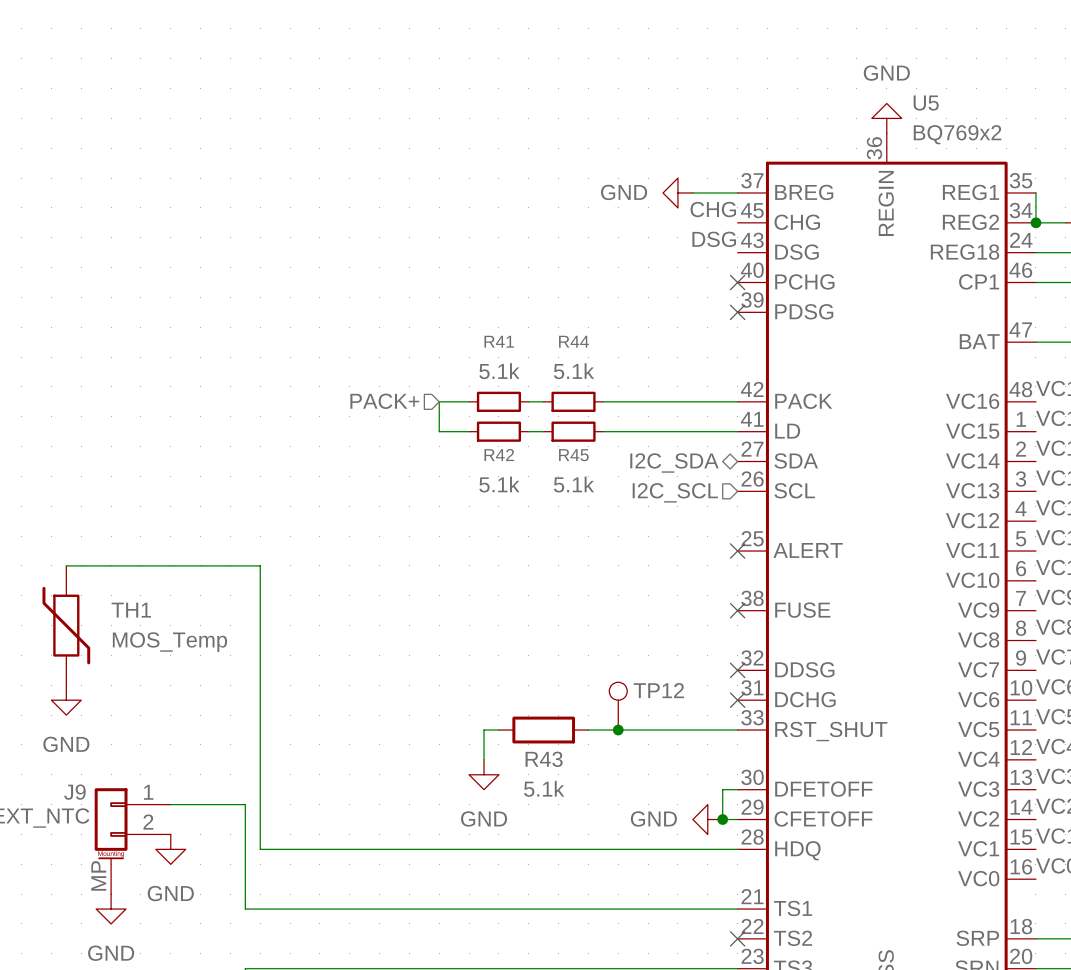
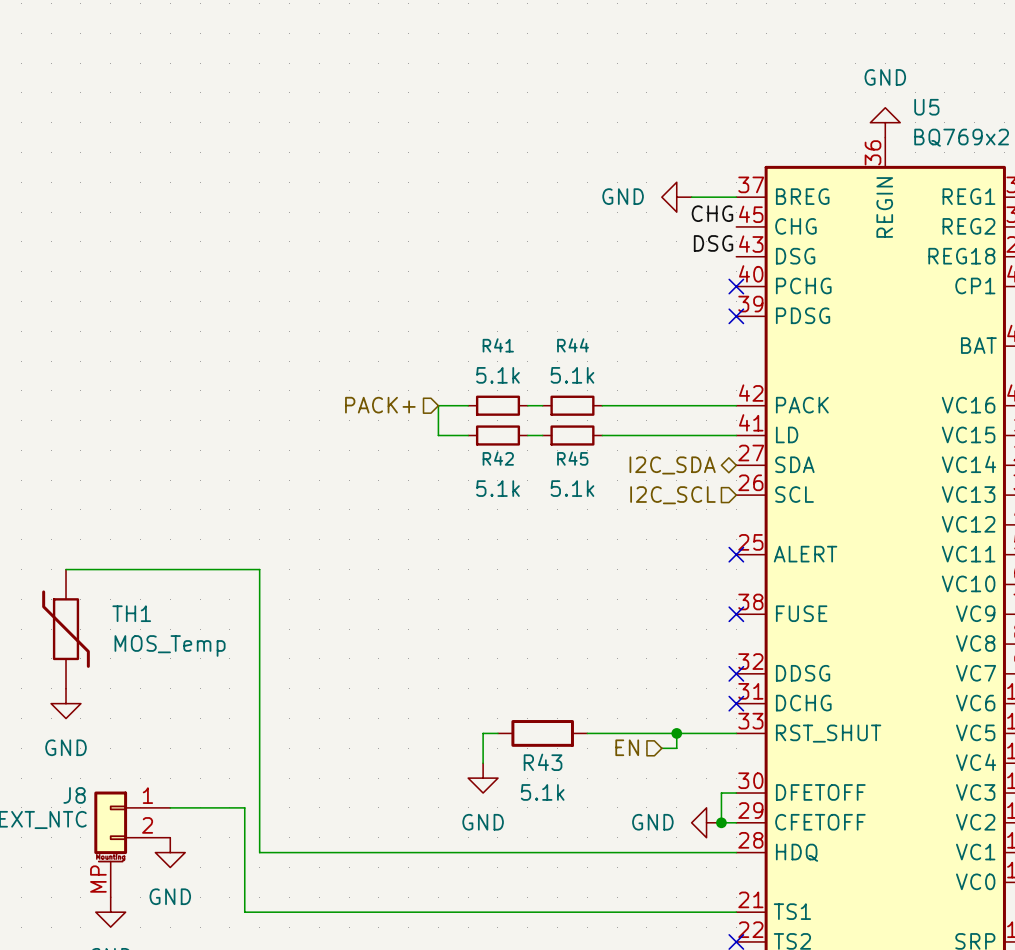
TP12: (618, 706) -> none
junction position: (618, 730) -> (676, 733)
wire: none -> (676, 733) (676, 748) (661, 748)
hierarchical label: none -> EN (627, 747)
J9 name: J9 (74, 792) -> J8 (74, 795)

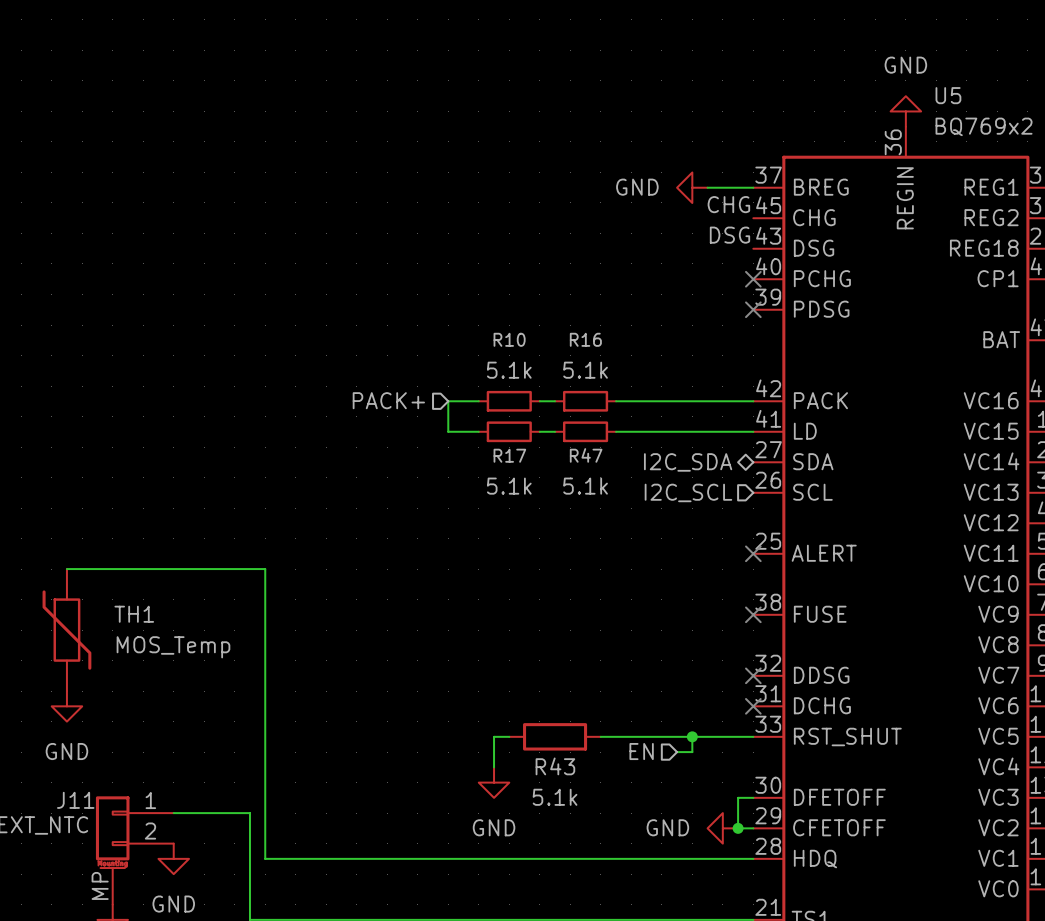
R41 name: R41 (498, 345) -> R10 (509, 339)
R44 name: R44 (573, 345) -> R16 (585, 339)
R42 name: R42 (498, 458) -> R17 (509, 455)
R45 name: R45 (572, 458) -> R47 (586, 455)
J8 name: J8 (74, 795) -> J11 (75, 800)

